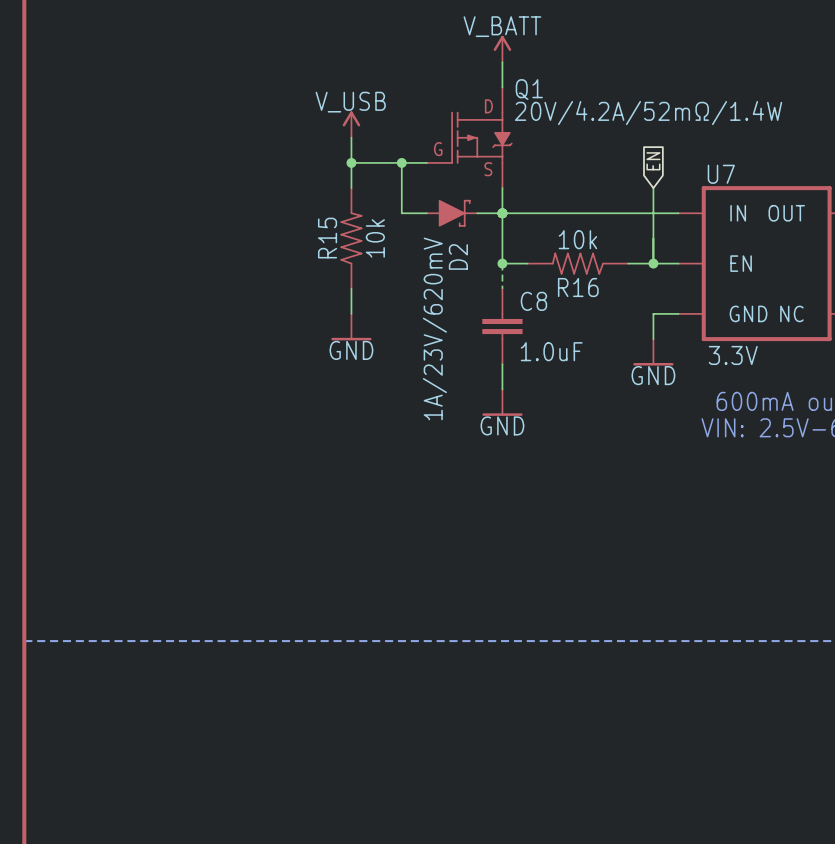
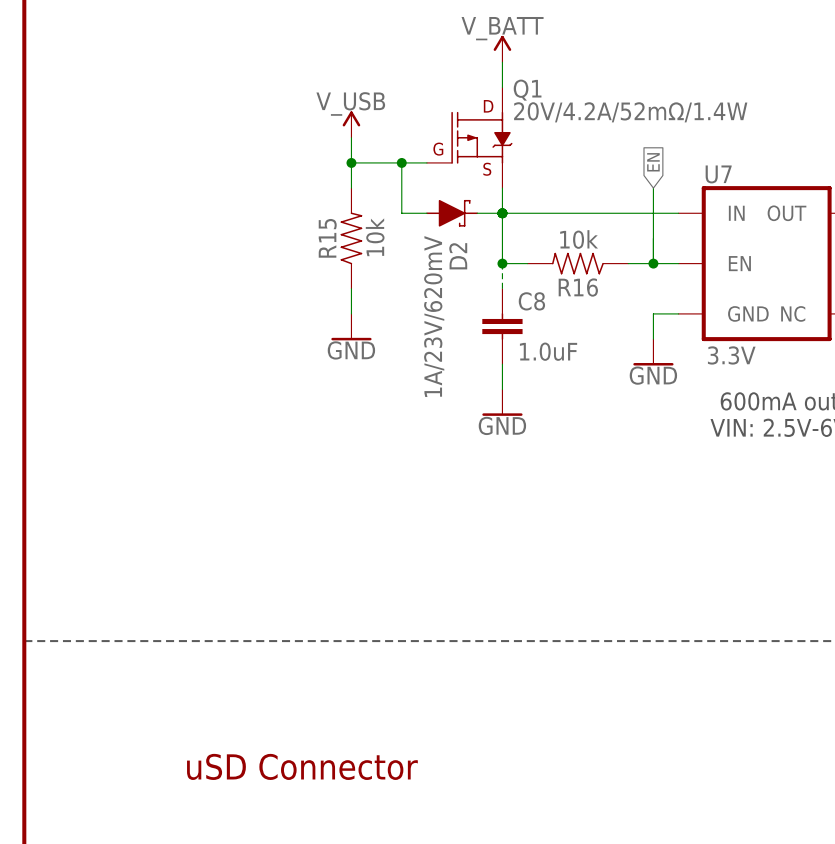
text: none -> uSD Connector (302, 766)

